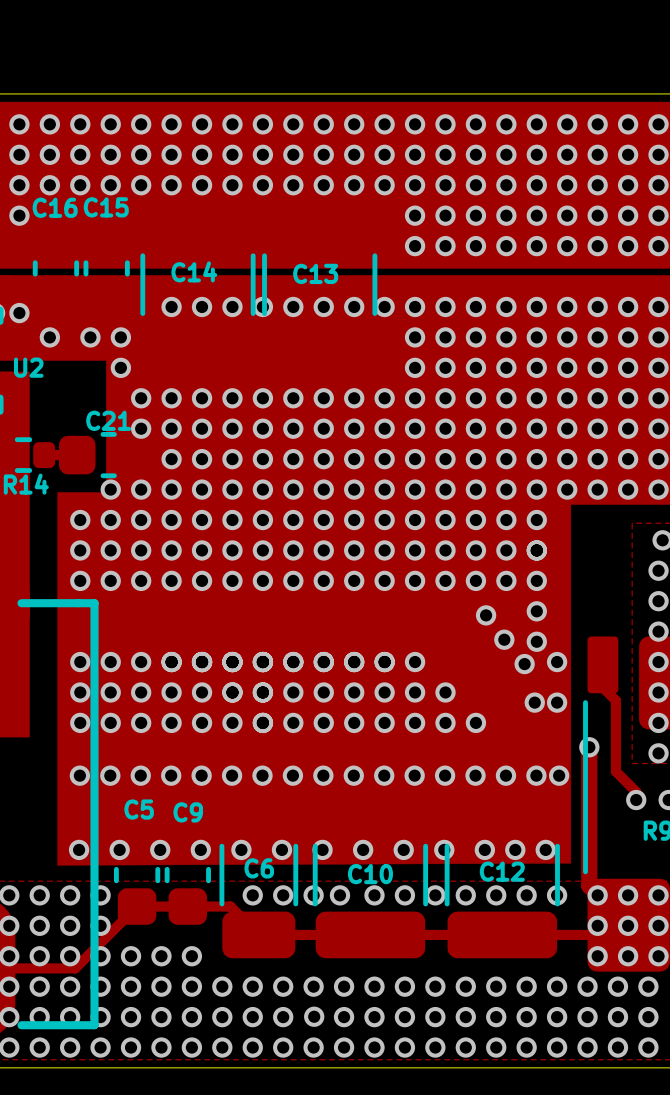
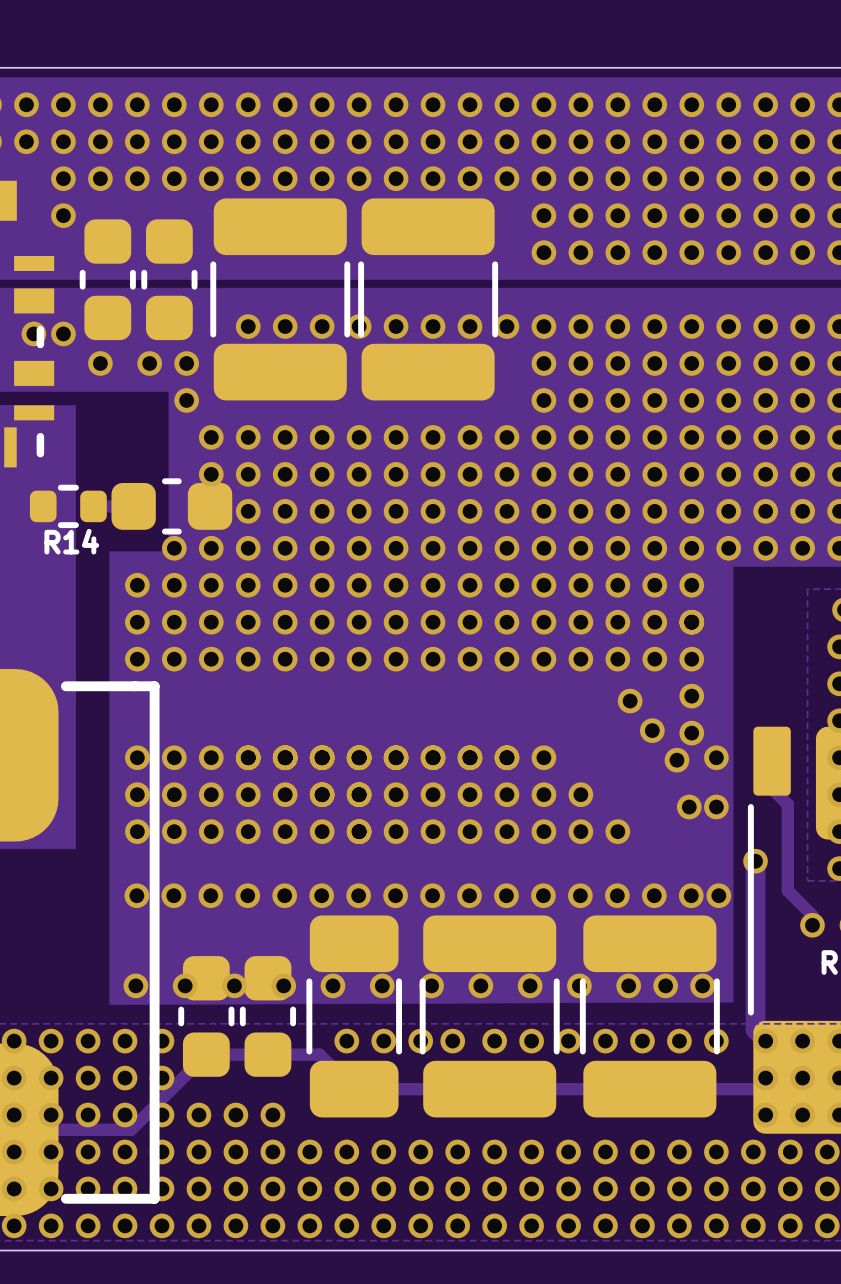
C16 name: C16 (55, 207) -> none
C15 name: C15 (106, 207) -> none
C14 name: C14 (194, 271) -> none
C13 name: C13 (315, 273) -> none
U2 name: U2 (28, 367) -> none
C21 name: C21 (108, 420) -> none
C5 name: C5 (139, 809) -> none
C9 name: C9 (188, 812) -> none
C6 name: C6 (259, 868) -> none
C12 name: C12 (502, 871) -> none
C10 name: C10 (370, 874) -> none

